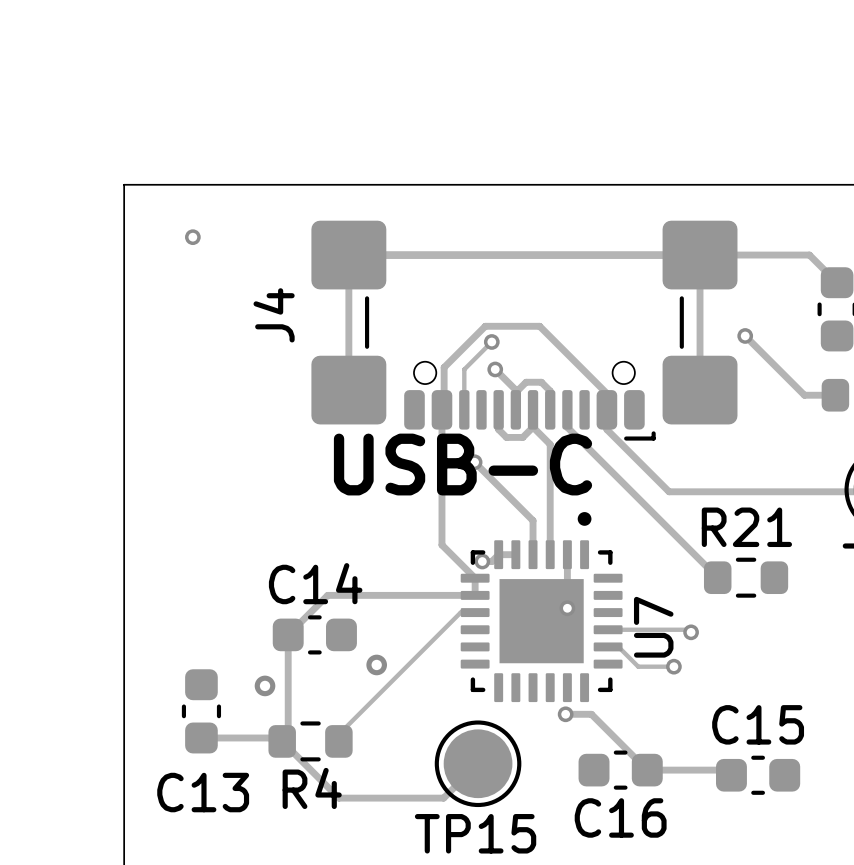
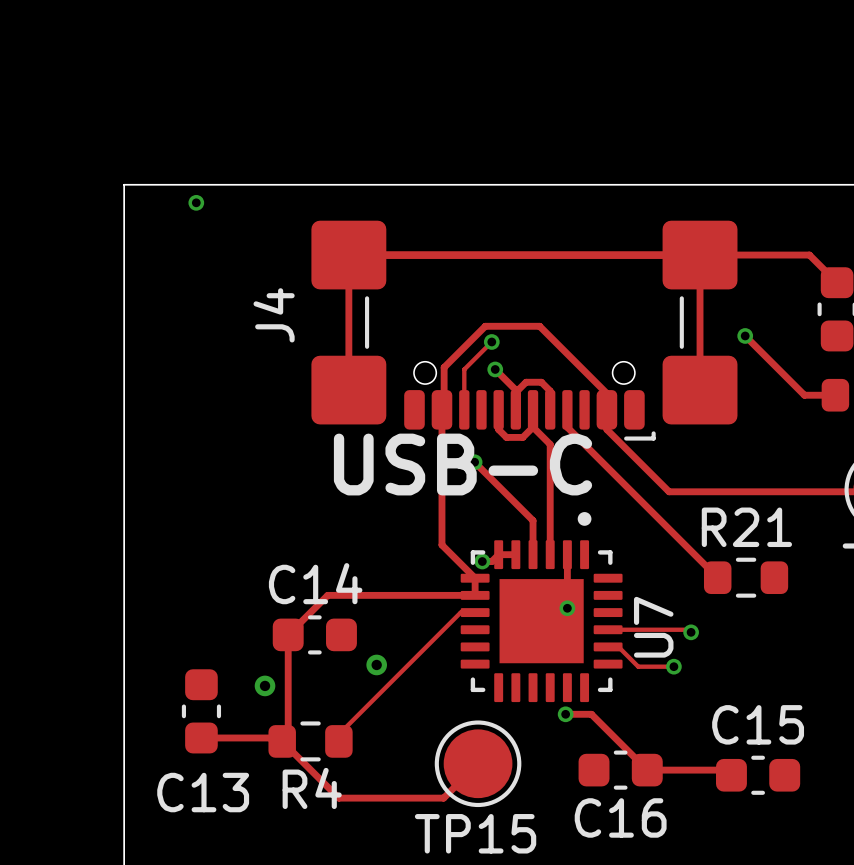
via position: (192, 237) -> (196, 202)

